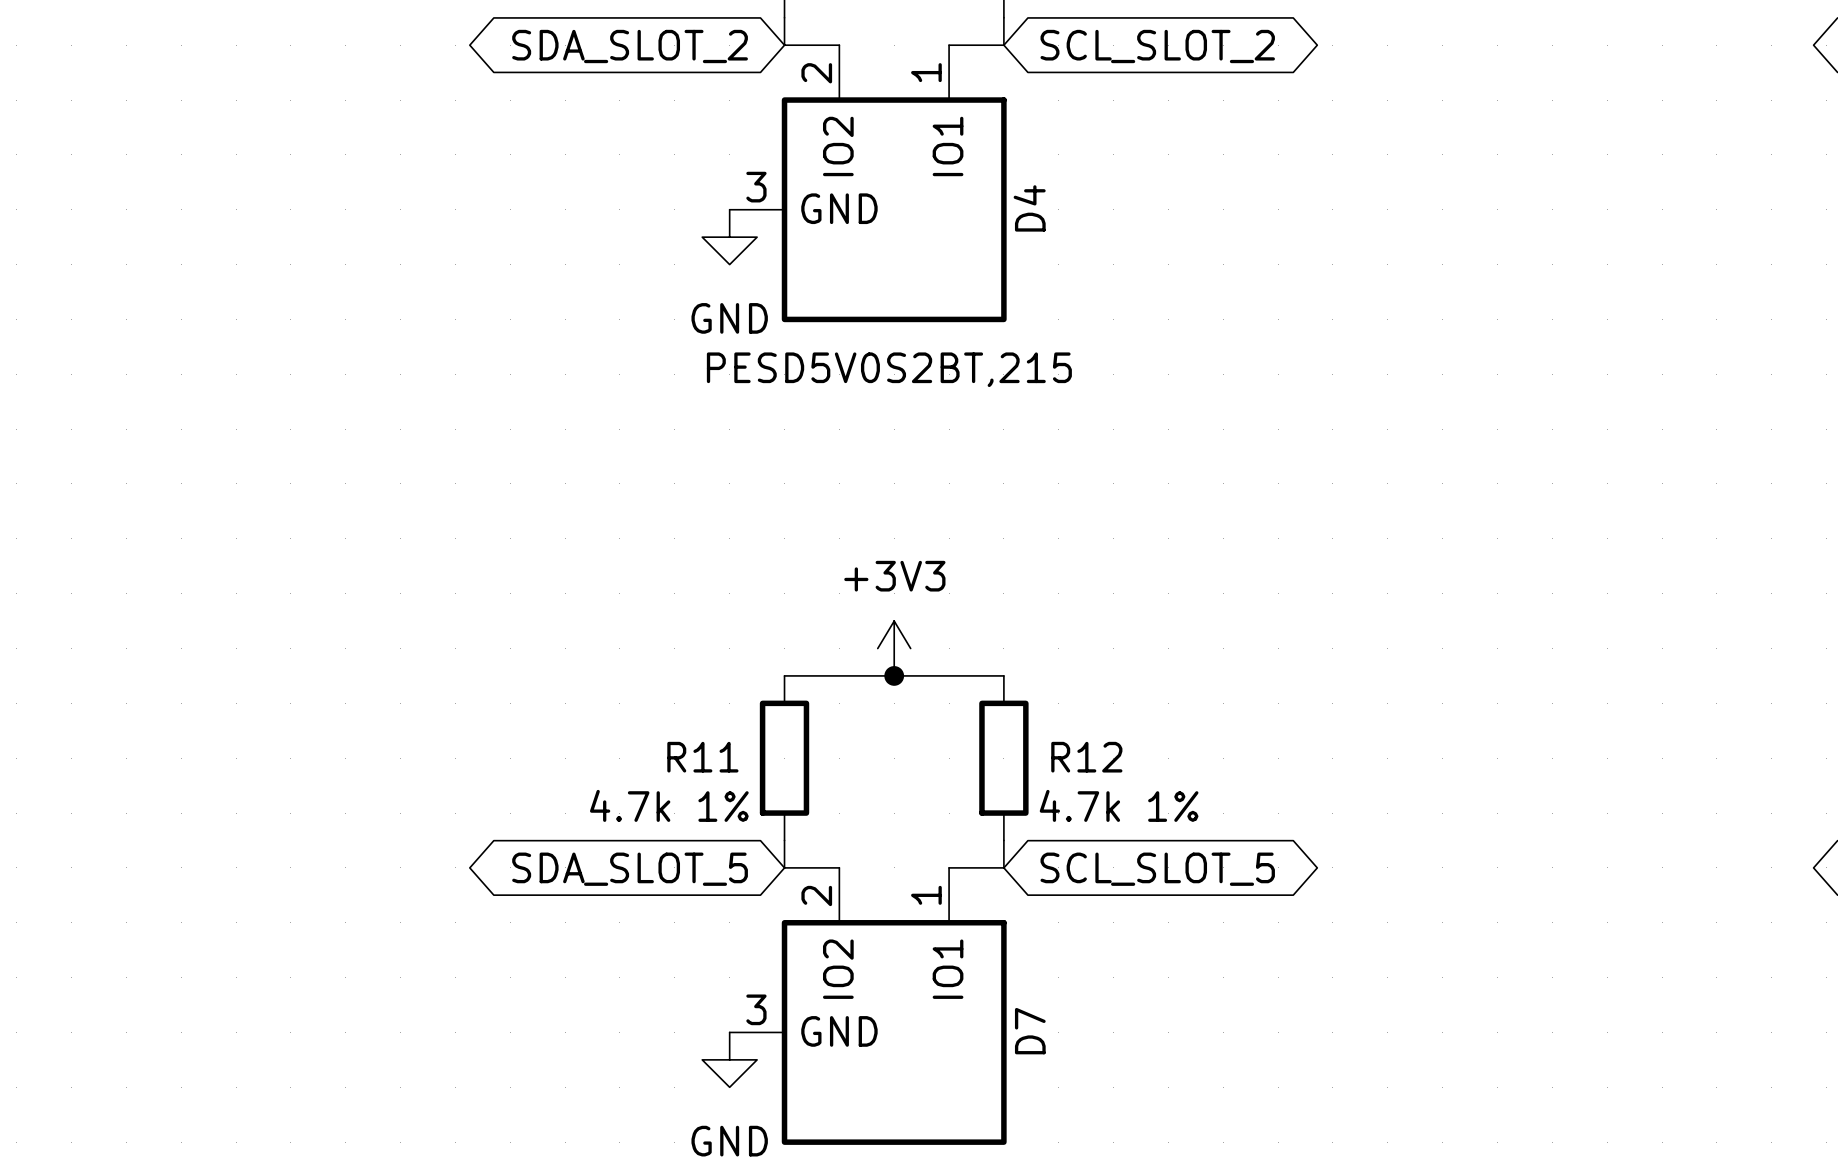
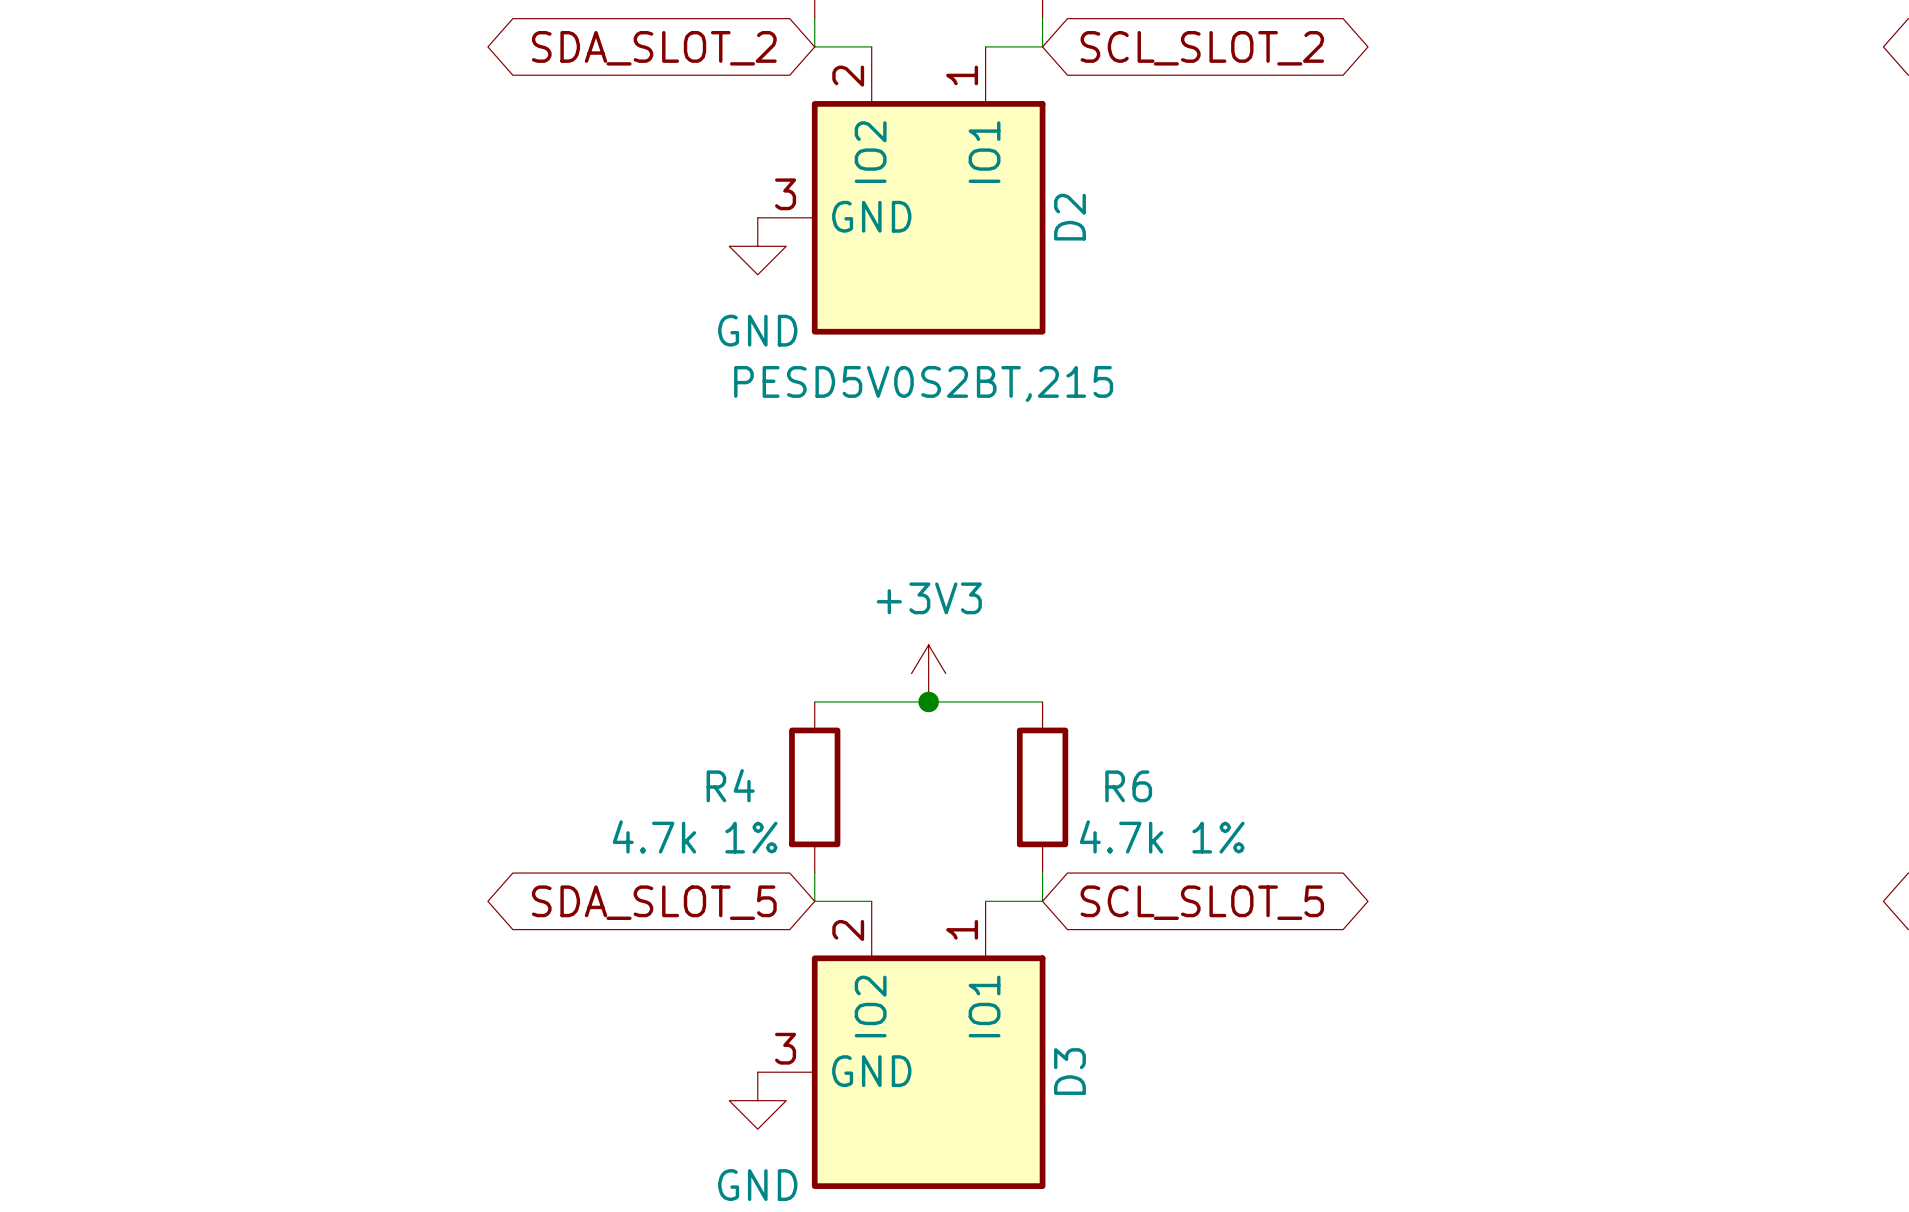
D4 name: D4 (1029, 208) -> D2 (1069, 217)
R11 name: R11 (702, 757) -> R4 (730, 785)
R12 name: R12 (1086, 757) -> R6 (1128, 786)
D7 name: D7 (1030, 1031) -> D3 (1069, 1071)

